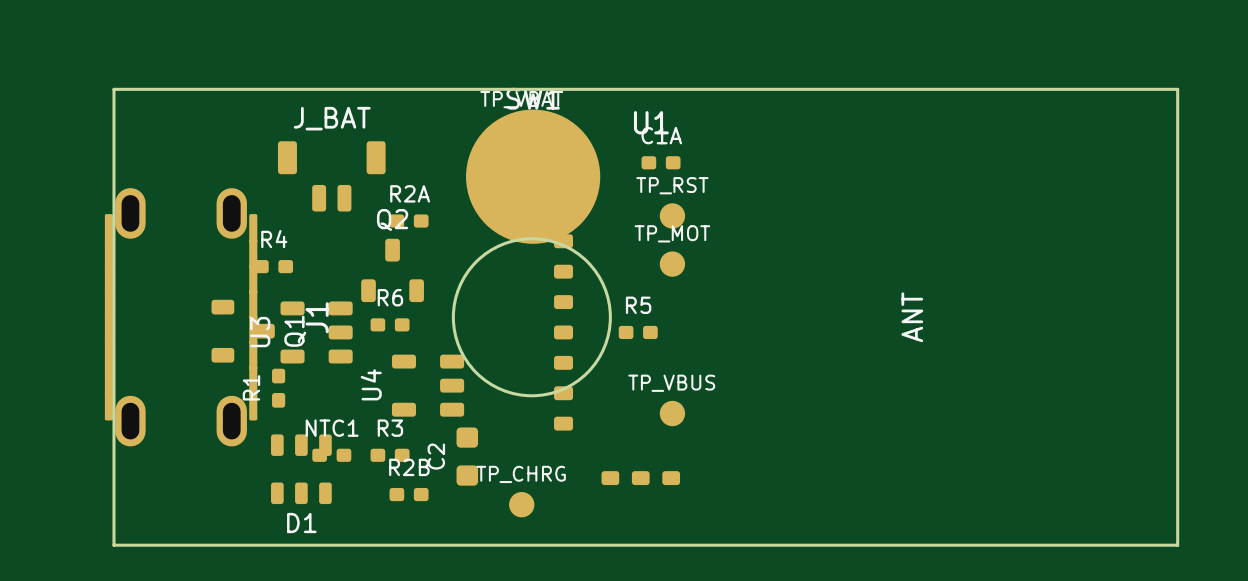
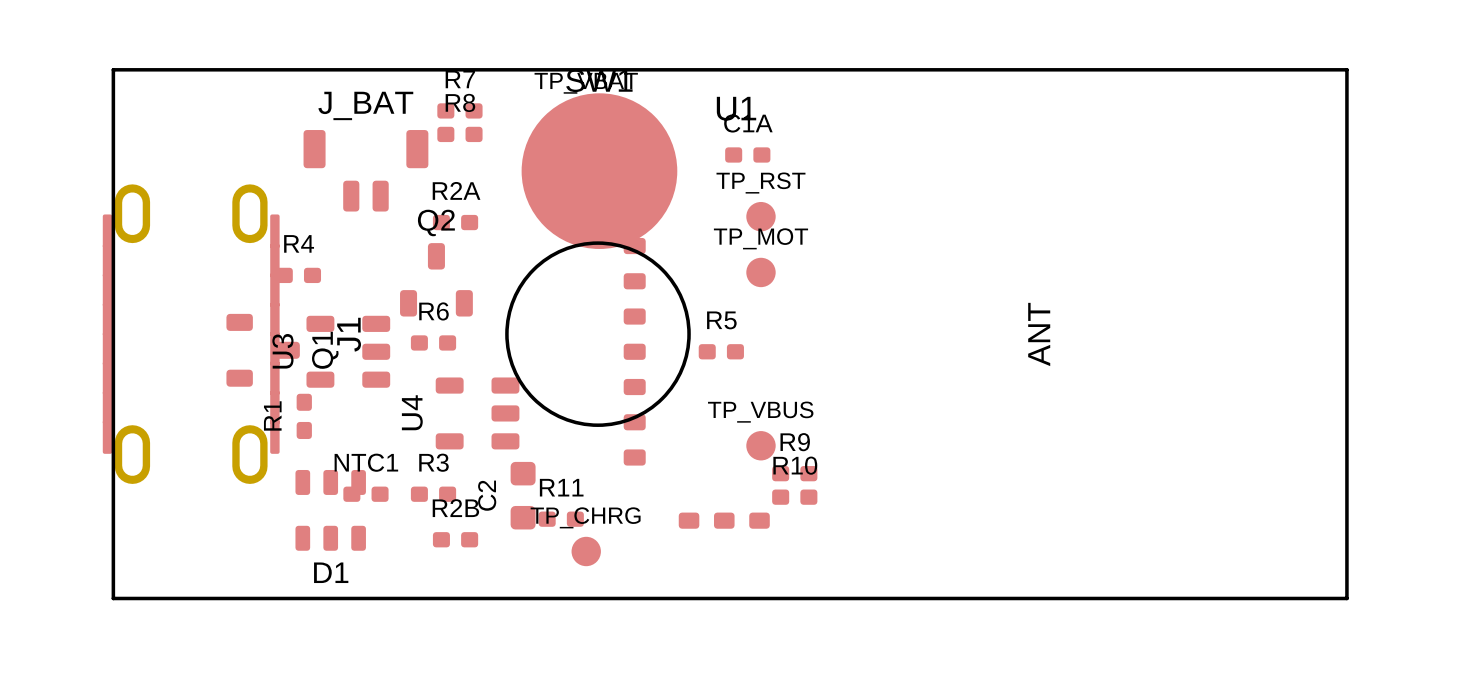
R7: none -> (459, 110)
R8: none -> (459, 134)
R9: none -> (794, 473)
R10: none -> (794, 497)
R11: none -> (561, 519)

